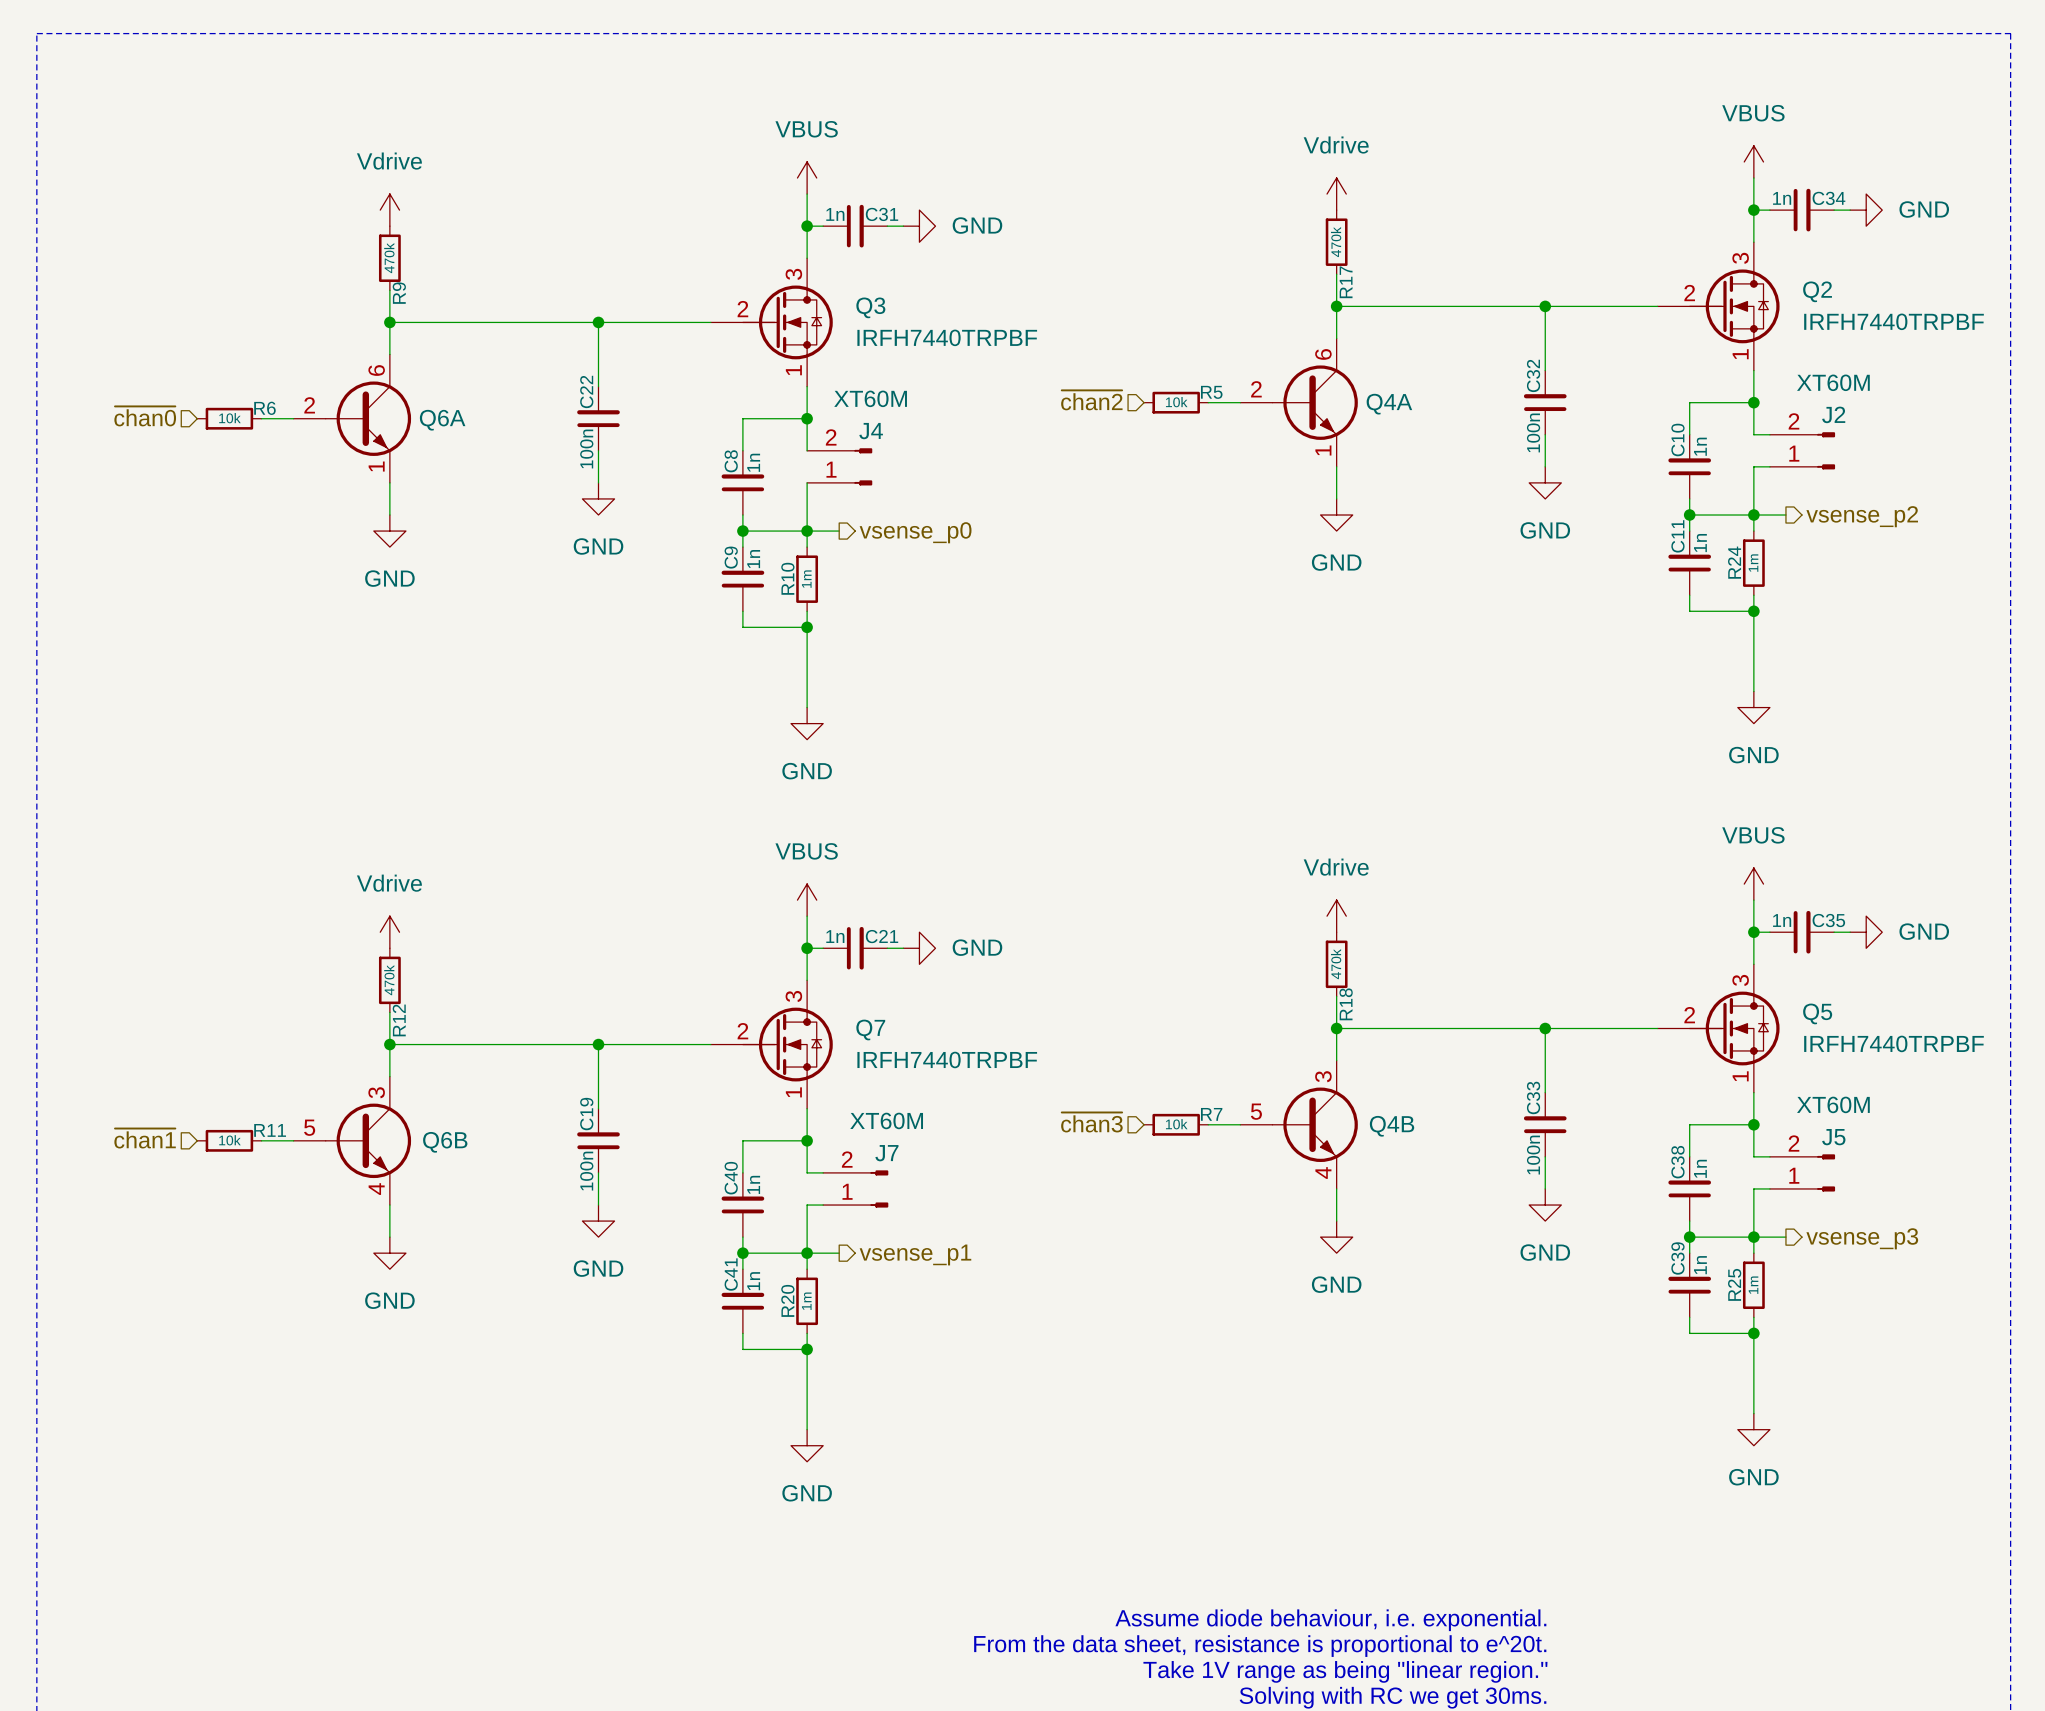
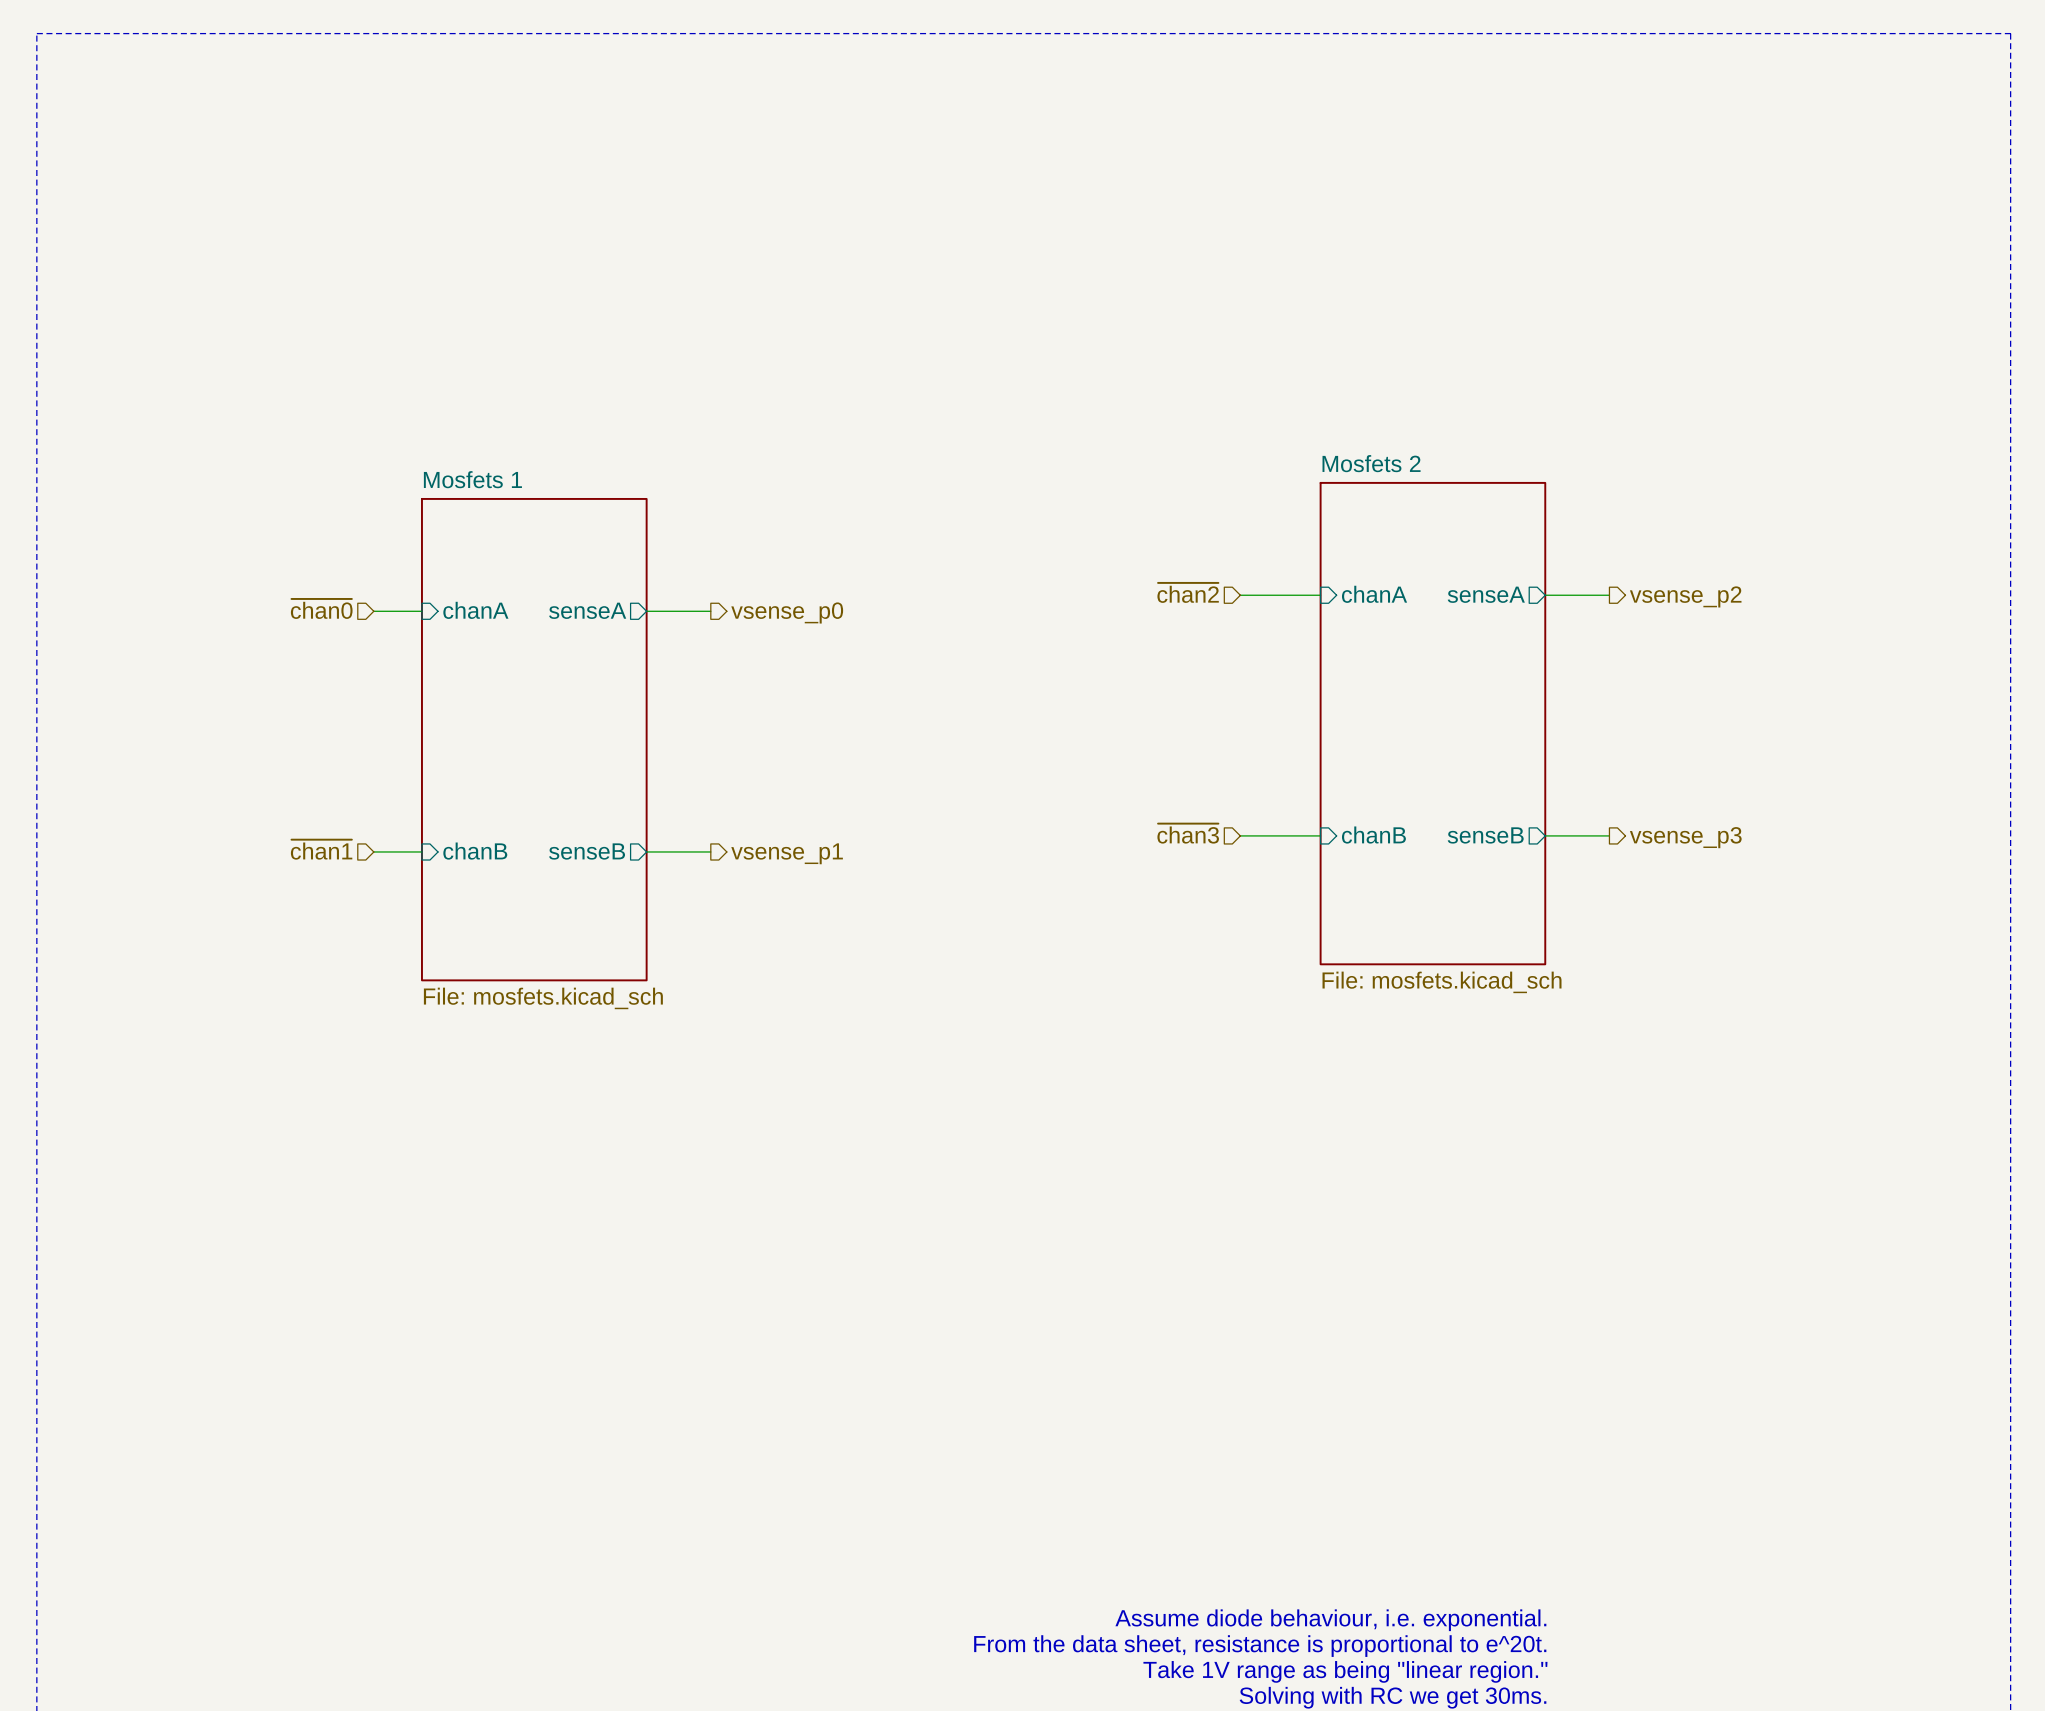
power symbol: VBUS (1753, 161) -> none
power symbol: VBUS (807, 178) -> none
wire: (1753, 178) (1753, 242) -> none
wire: (807, 194) (807, 258) -> none
power symbol: Vdrive (1336, 194) -> none
power symbol: Vdrive (389, 210) -> none
wire: (1753, 210) (1769, 210) -> none
junction: (1753, 210) -> none
C34: 1n (1802, 210) -> none
wire: (1834, 210) (1850, 210) -> none
power symbol: GND (1866, 210) -> none
wire: (807, 226) (823, 226) -> none
junction: (807, 226) -> none
C31: 1n (855, 226) -> none
wire: (887, 226) (903, 226) -> none
power symbol: GND (919, 226) -> none
R17: 470k (1336, 242) -> none
R9: 470k (389, 258) -> none
wire: (1336, 274) (1336, 338) -> none
wire: (389, 290) (389, 354) -> none
wire: (1336, 306) (1657, 306) -> none
junction: (1336, 306) -> none
wire: (1545, 306) (1545, 370) -> none
junction: (1545, 306) -> none
Q2: IRFH7440TRPBF (1718, 306) -> none
wire: (389, 322) (710, 322) -> none
junction: (389, 322) -> none
wire: (598, 322) (598, 386) -> none
junction: (598, 322) -> none
Q3: IRFH7440TRPBF (771, 322) -> none
wire: (1753, 370) (1753, 434) (1769, 434) -> none
wire: (807, 386) (807, 450) -> none
hierarchical label position: ~{chan2} (1091, 400) -> ~{chan2} (1188, 592)
R5: 10k (1176, 402) -> none
wire: (1208, 402) (1240, 402) -> none
Q4A: (1299, 402) -> none
C32: 100n (1545, 402) -> none
wire: (1753, 402) (1689, 402) (1689, 434) -> none
junction: (1753, 402) -> none
hierarchical label position: ~{chan0} (145, 416) -> ~{chan0} (321, 608)
R6: 10k (229, 418) -> none
wire: (261, 418) (293, 418) -> none
Q6A: (352, 418) -> none
C22: 100n (598, 418) -> none
wire: (807, 418) (742, 418) (742, 450) -> none
junction: (807, 418) -> none
wire: (1545, 434) (1545, 466) -> none
wire: (598, 450) (598, 482) -> none
J2: XT60M (1802, 450) -> none
J4: XT60M (839, 466) -> none
wire: (1336, 466) (1336, 498) -> none
C10: 1n (1689, 466) -> none
wire: (1769, 466) (1753, 466) (1753, 531) -> none
wire: (389, 482) (389, 515) -> none
C8: 1n (742, 482) -> none
wire: (807, 482) (807, 547) -> none
power symbol: GND (1545, 482) -> none
power symbol: GND (598, 498) -> none
wire: (1689, 498) (1689, 531) -> none
wire: (742, 515) (742, 547) -> none
power symbol: GND (1336, 515) -> none
wire: (1689, 515) (1785, 515) -> none
junction: (1689, 515) -> none
junction: (1753, 515) -> none
hierarchical label position: vsense_p2 (1862, 516) -> vsense_p2 (1685, 596)
power symbol: GND (389, 531) -> none
wire: (742, 531) (839, 531) -> none
junction: (742, 531) -> none
junction: (807, 531) -> none
hierarchical label position: vsense_p0 (915, 532) -> vsense_p0 (787, 612)
C11: 1n (1689, 563) -> none
R24: 1m (1753, 563) -> none
C9: 1n (742, 579) -> none
R10: 1m (807, 579) -> none
sheet pin: none -> chanA (1374, 594)
sheet pin: none -> senseA (1486, 594)
wire: none -> (1240, 595) (1320, 595)
wire: none -> (1545, 595) (1609, 595)
wire: (1689, 595) (1689, 611) (1753, 611) -> none
wire: (1753, 595) (1753, 691) -> none
sheet pin: none -> chanA (475, 610)
sheet pin: none -> senseA (587, 610)
wire: none -> (373, 611) (421, 611)
wire: none -> (646, 611) (710, 611)
wire: (742, 611) (742, 627) (807, 627) -> none
wire: (807, 611) (807, 707) -> none
junction: (1753, 611) -> none
junction: (807, 627) -> none
power symbol: GND (1753, 707) -> none
power symbol: GND (807, 723) -> none
sheet Mosfets 2: none -> File: mosfets.kicad_sch (1432, 723)
sheet Mosfets 1: none -> File: mosfets.kicad_sch (534, 739)
wire: none -> (1240, 835) (1320, 835)
sheet pin: none -> chanB (1373, 835)
sheet pin: none -> senseB (1485, 835)
wire: none -> (1545, 835) (1609, 835)
hierarchical label: none -> vsense_p3 (1685, 837)
hierarchical label: none -> ~{chan1} (321, 849)
wire: none -> (373, 851) (421, 851)
sheet pin: none -> chanB (475, 851)
sheet pin: none -> senseB (587, 851)
wire: none -> (646, 851) (710, 851)
hierarchical label: none -> vsense_p1 (787, 853)
power symbol: VBUS (1753, 884) -> none
power symbol: VBUS (807, 900) -> none
wire: (1753, 900) (1753, 964) -> none
wire: (807, 916) (807, 980) -> none
power symbol: Vdrive (1336, 916) -> none
power symbol: Vdrive (389, 932) -> none
wire: (1753, 932) (1769, 932) -> none
junction: (1753, 932) -> none
C35: 1n (1802, 932) -> none
wire: (1834, 932) (1850, 932) -> none
power symbol: GND (1866, 932) -> none
wire: (807, 948) (823, 948) -> none
junction: (807, 948) -> none
C21: 1n (855, 948) -> none
wire: (887, 948) (903, 948) -> none
power symbol: GND (919, 948) -> none
R18: 470k (1336, 964) -> none
R12: 470k (389, 980) -> none
wire: (1336, 996) (1336, 1060) -> none
wire: (389, 1012) (389, 1076) -> none
wire: (1336, 1028) (1657, 1028) -> none
junction: (1336, 1028) -> none
wire: (1545, 1028) (1545, 1092) -> none
junction: (1545, 1028) -> none
Q5: IRFH7440TRPBF (1718, 1028) -> none
wire: (389, 1044) (710, 1044) -> none
junction: (389, 1044) -> none
wire: (598, 1044) (598, 1108) -> none
junction: (598, 1044) -> none
Q7: IRFH7440TRPBF (771, 1044) -> none
wire: (1753, 1092) (1753, 1156) (1769, 1156) -> none
wire: (807, 1108) (807, 1172) (823, 1172) -> none
hierarchical label position: ~{chan3} (1091, 1122) -> ~{chan3} (1188, 833)
R7: 10k (1176, 1124) -> none
wire: (1208, 1124) (1240, 1124) -> none
Q4B: (1299, 1124) -> none
C33: 100n (1545, 1124) -> none
wire: (1753, 1124) (1689, 1124) (1689, 1156) -> none
junction: (1753, 1124) -> none
hierarchical label: ~{chan1} (145, 1138) -> none
R11: 10k (229, 1140) -> none
wire: (261, 1140) (293, 1140) -> none
Q6B: (352, 1140) -> none
C19: 100n (598, 1140) -> none
wire: (807, 1140) (742, 1140) (742, 1172) -> none
junction: (807, 1140) -> none
wire: (1545, 1156) (1545, 1188) -> none
wire: (598, 1172) (598, 1205) -> none
J5: XT60M (1802, 1172) -> none
J7: XT60M (855, 1188) -> none
wire: (1336, 1188) (1336, 1221) -> none
C38: 1n (1689, 1188) -> none
wire: (1769, 1188) (1753, 1188) (1753, 1253) -> none
wire: (389, 1205) (389, 1237) -> none
C40: 1n (742, 1205) -> none
wire: (823, 1205) (807, 1205) (807, 1269) -> none
power symbol: GND (1545, 1205) -> none
power symbol: GND (598, 1221) -> none
wire: (1689, 1221) (1689, 1253) -> none
wire: (742, 1237) (742, 1269) -> none
power symbol: GND (1336, 1237) -> none
wire: (1689, 1237) (1785, 1237) -> none
junction: (1689, 1237) -> none
junction: (1753, 1237) -> none
hierarchical label: vsense_p3 (1862, 1238) -> none
power symbol: GND (389, 1253) -> none
wire: (742, 1253) (839, 1253) -> none
junction: (742, 1253) -> none
junction: (807, 1253) -> none
hierarchical label: vsense_p1 (915, 1254) -> none
C39: 1n (1689, 1285) -> none
R25: 1m (1753, 1285) -> none
C41: 1n (742, 1301) -> none
R20: 1m (807, 1301) -> none
wire: (1689, 1317) (1689, 1333) (1753, 1333) -> none
wire: (1753, 1317) (1753, 1413) -> none
wire: (742, 1333) (742, 1349) (807, 1349) -> none
wire: (807, 1333) (807, 1429) -> none
junction: (1753, 1333) -> none
junction: (807, 1349) -> none
power symbol: GND (1753, 1429) -> none
power symbol: GND (807, 1445) -> none

